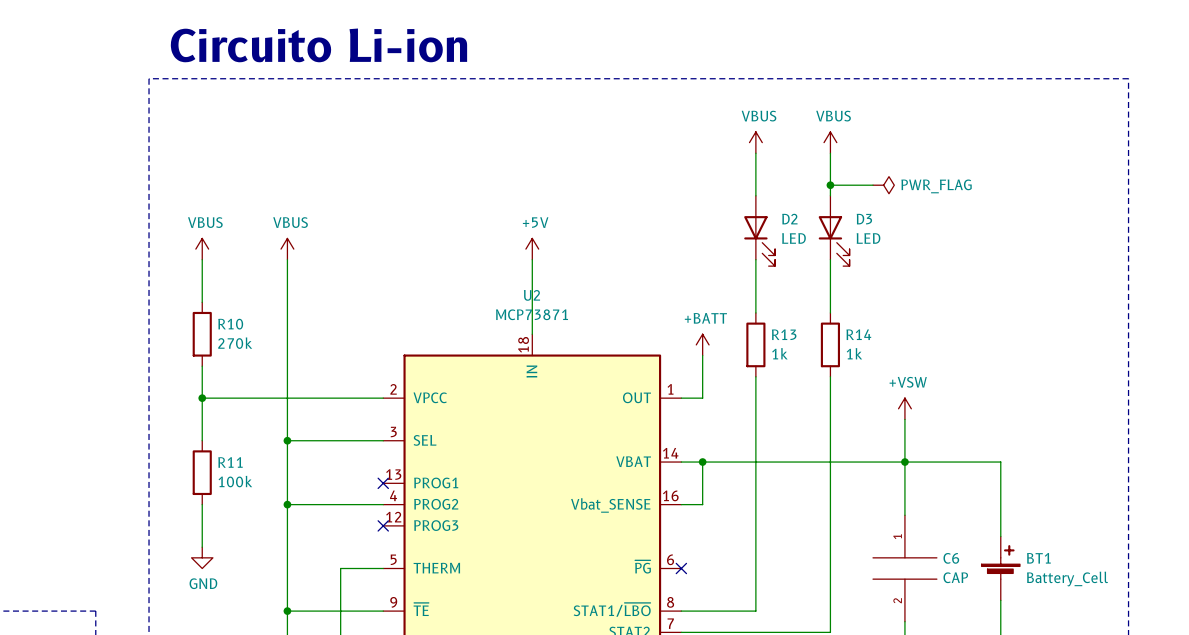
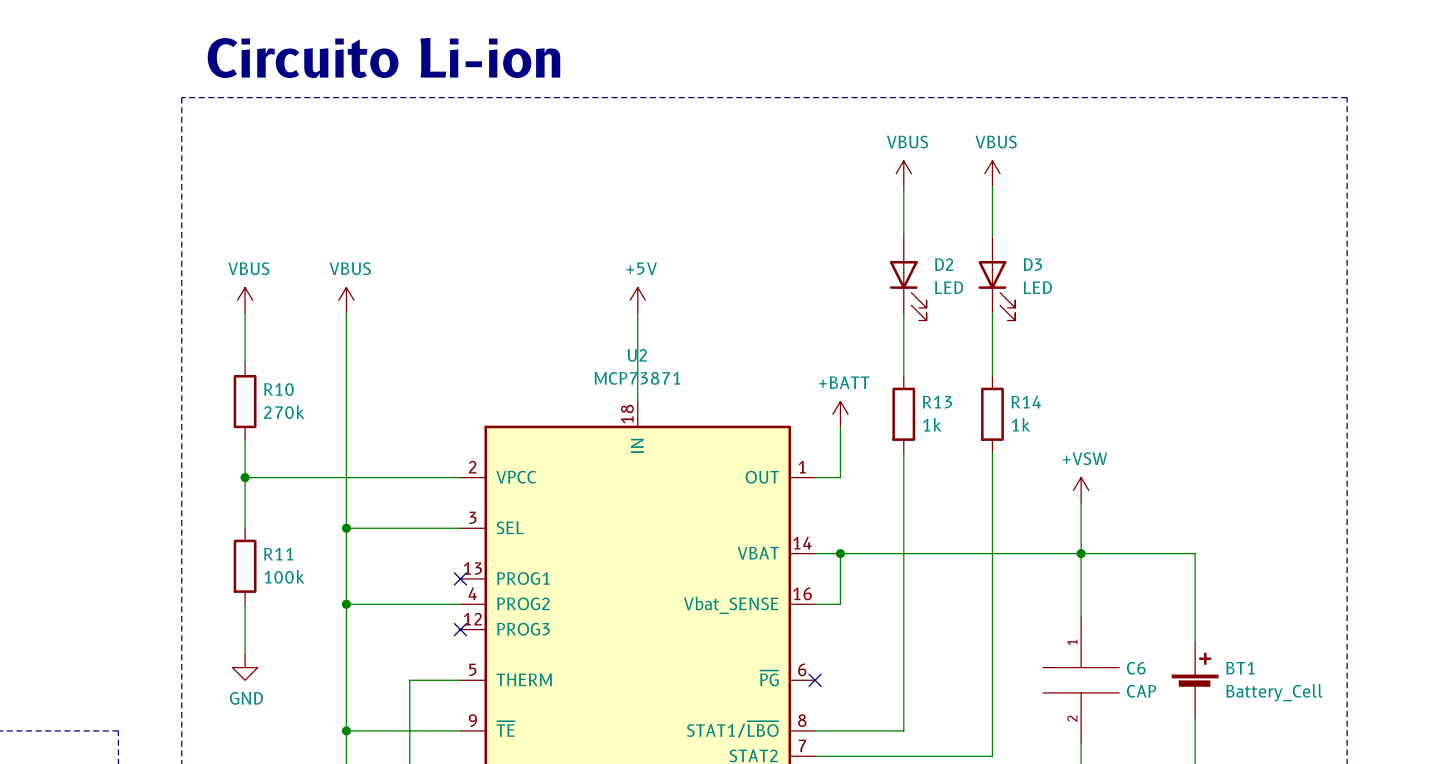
wire: (830, 185) (873, 185) -> none
junction: (830, 185) -> none
power symbol: PWR_FLAG (883, 185) -> none

